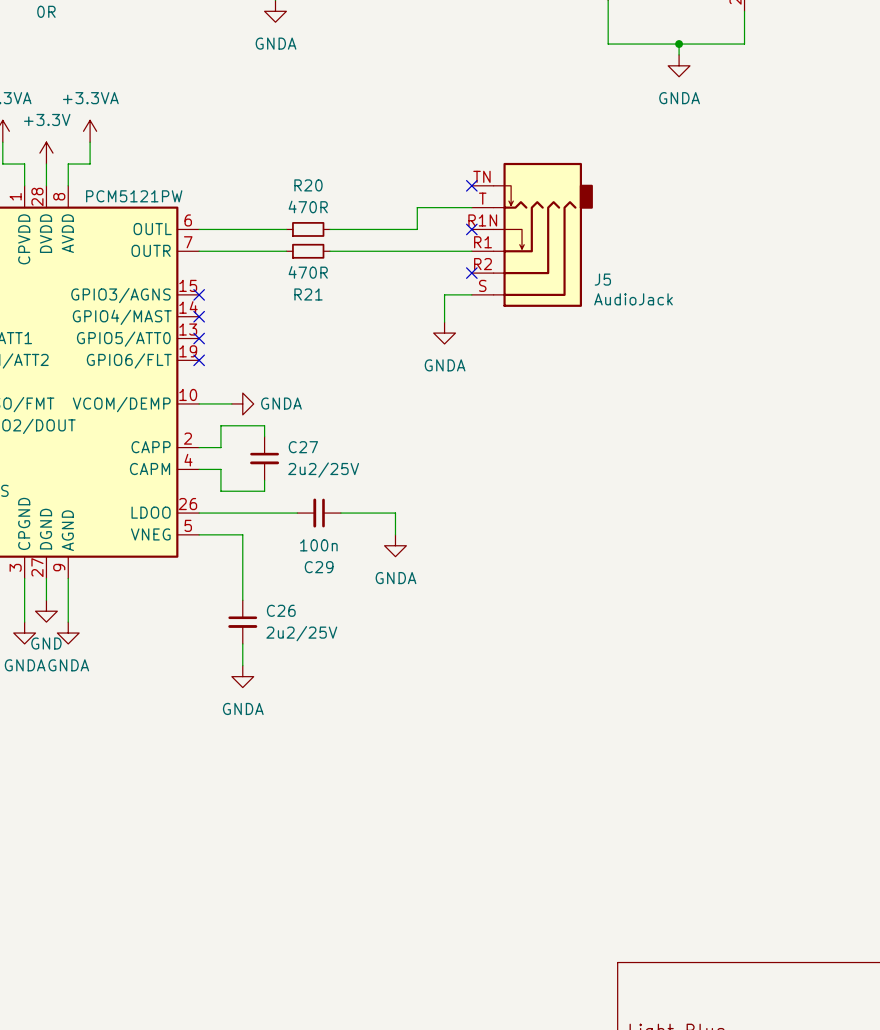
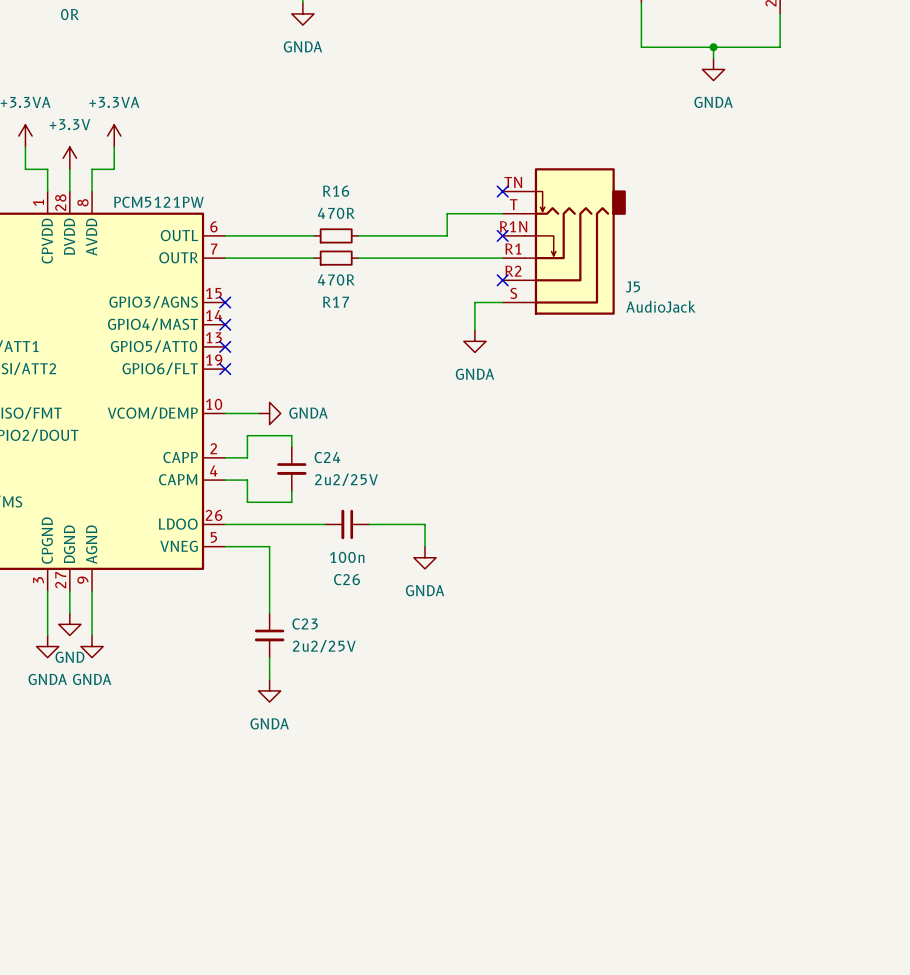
R20 name: R20 (308, 185) -> R16 (336, 191)
R21 name: R21 (308, 294) -> R17 (336, 302)
C27 name: C27 (303, 447) -> C24 (327, 457)
C29 name: C29 (319, 567) -> C26 (346, 579)
C26 name: C26 (281, 610) -> C23 (305, 624)

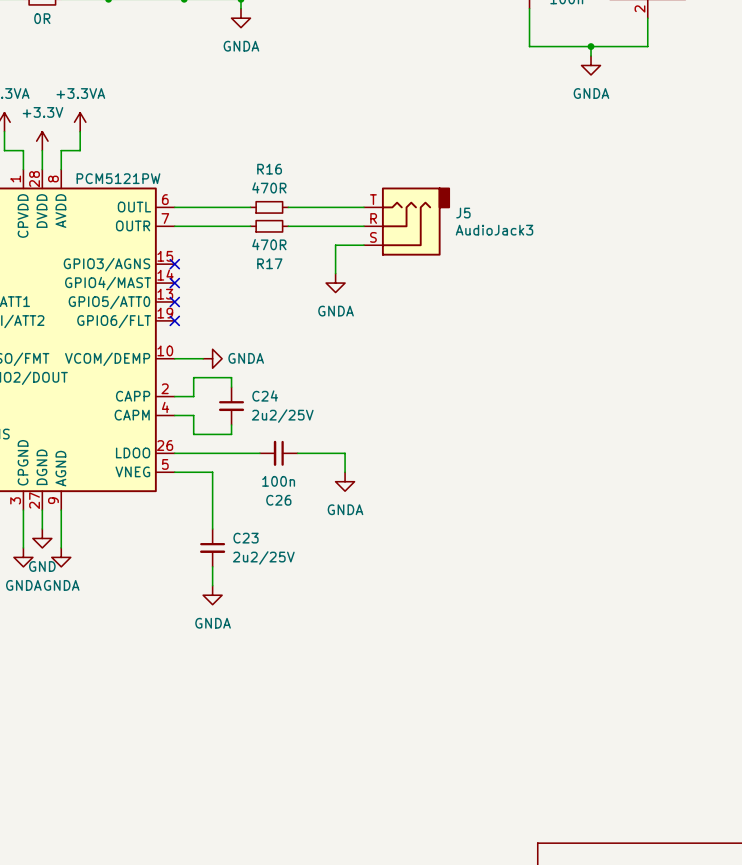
J5 symbol: [502, 168, 626, 315] -> [363, 187, 451, 256]
no-connect mark: (502, 191) -> none
wire: (502, 213) (447, 213) (447, 235) -> none
no-connect mark: (502, 235) -> none
wire: none -> (363, 245) (335, 245) (335, 273)
no-connect mark: (502, 280) -> none
J5 name position: J5 (632, 287) -> J5 (463, 213)
wire: (502, 302) (474, 302) (474, 330) -> none
J5 value: AudioJack (660, 306) -> AudioJack3 (494, 230)
power symbol position: GNDA (474, 341) -> GNDA (335, 283)

